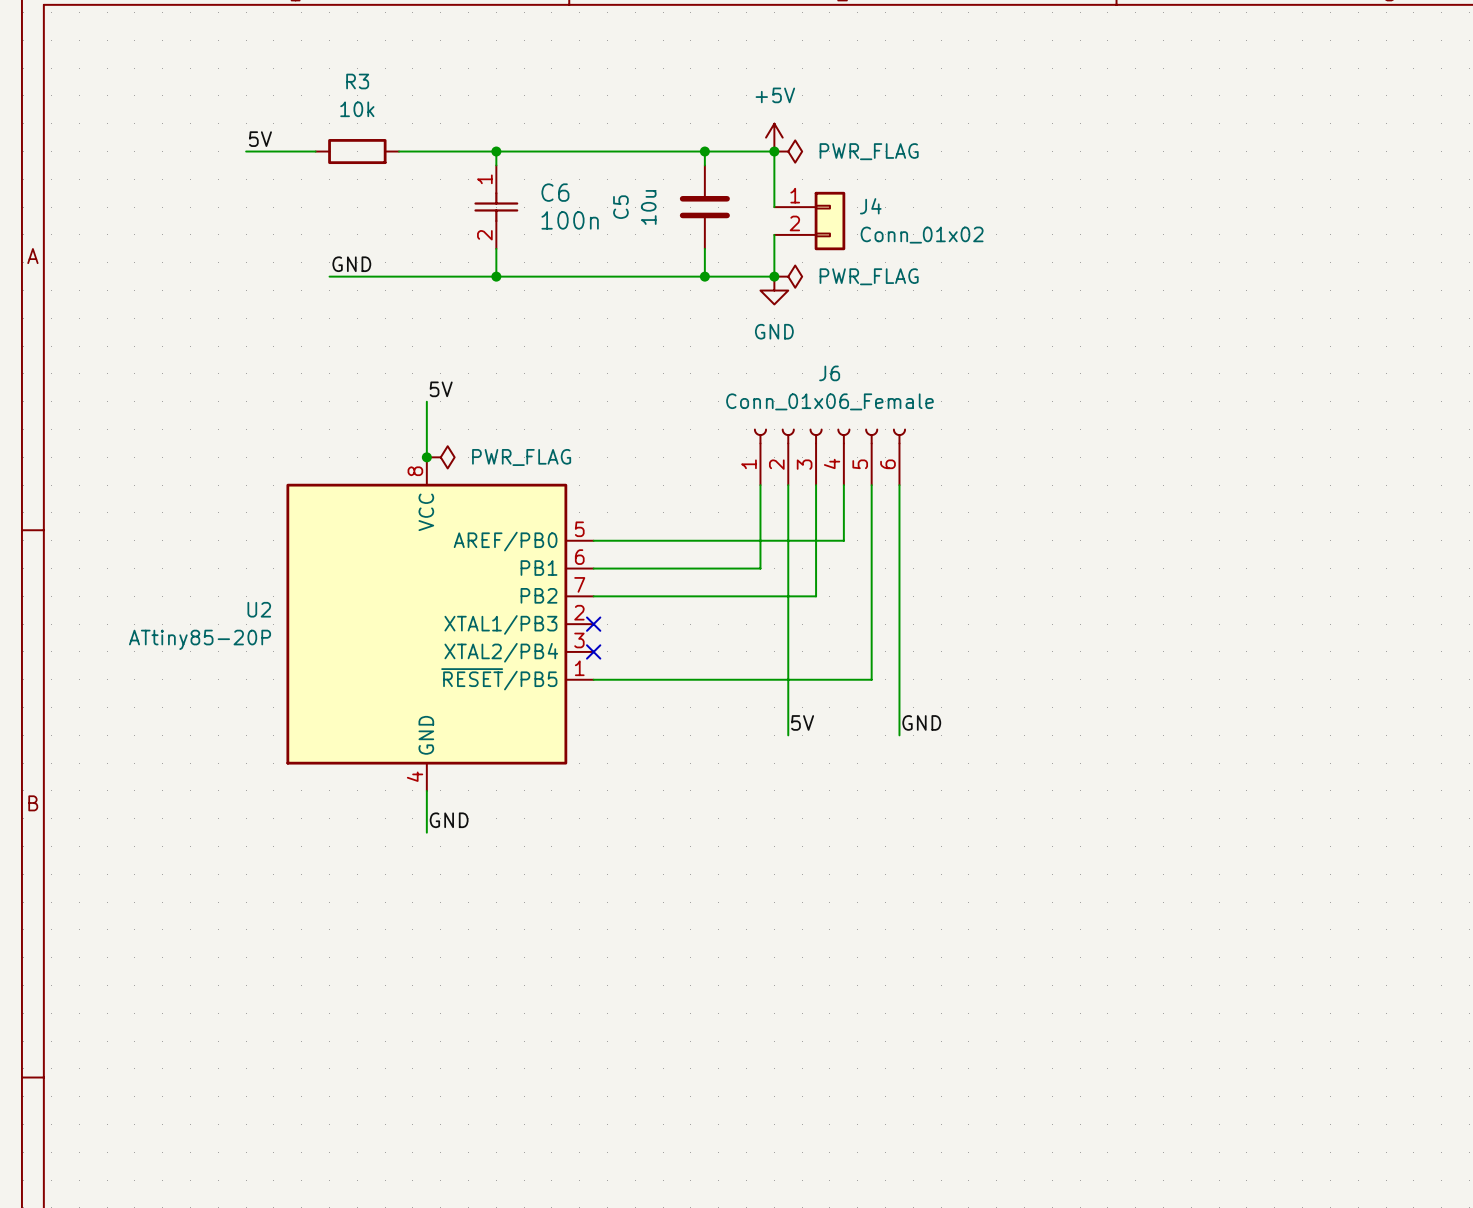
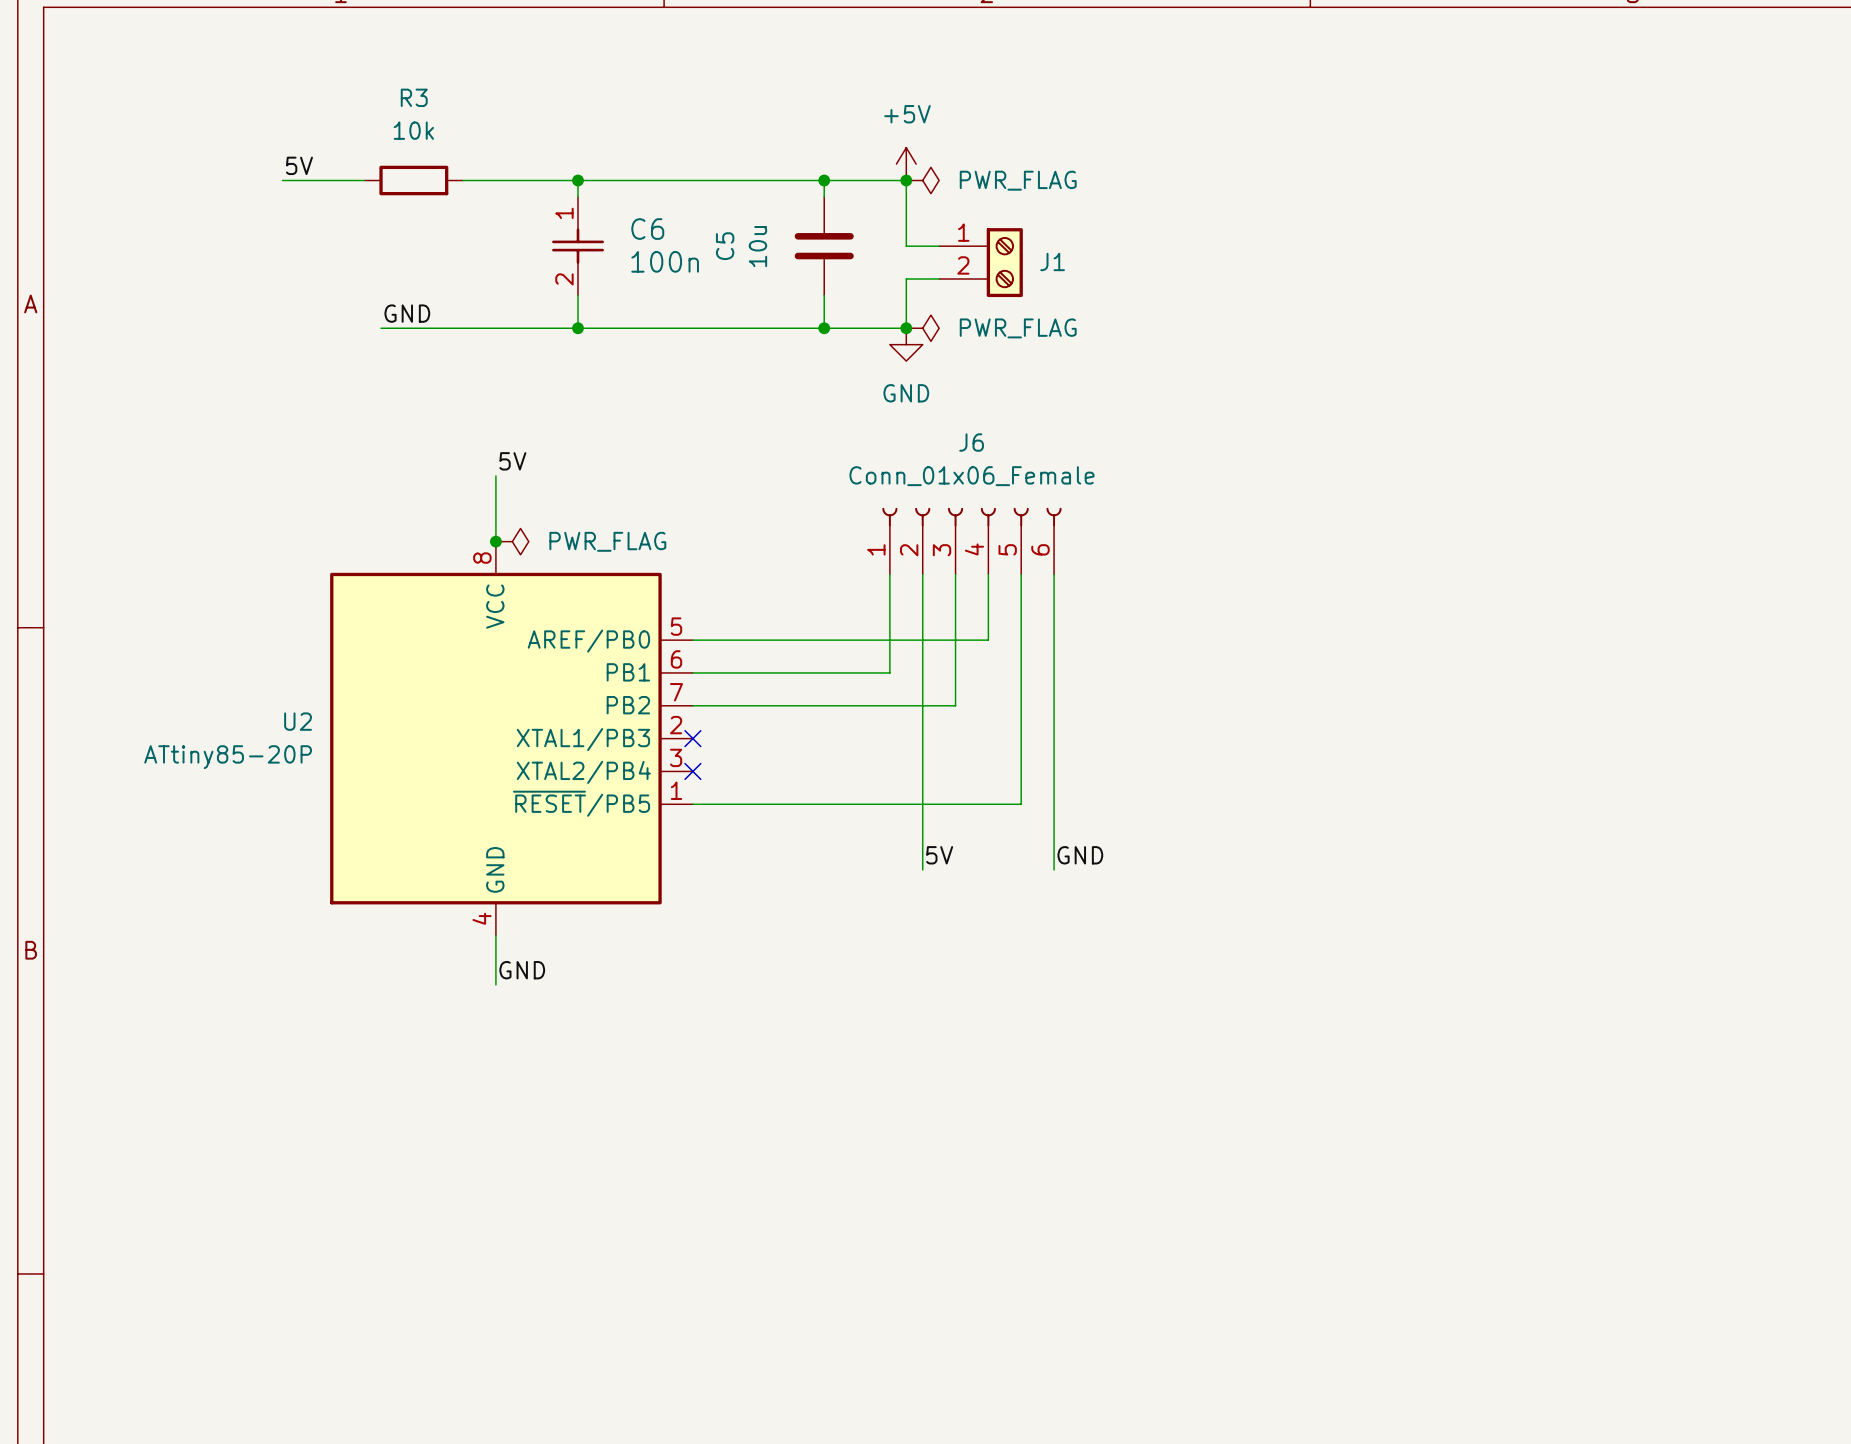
J4: Conn_01x02 (809, 221) -> none
J1: none -> (980, 262)

